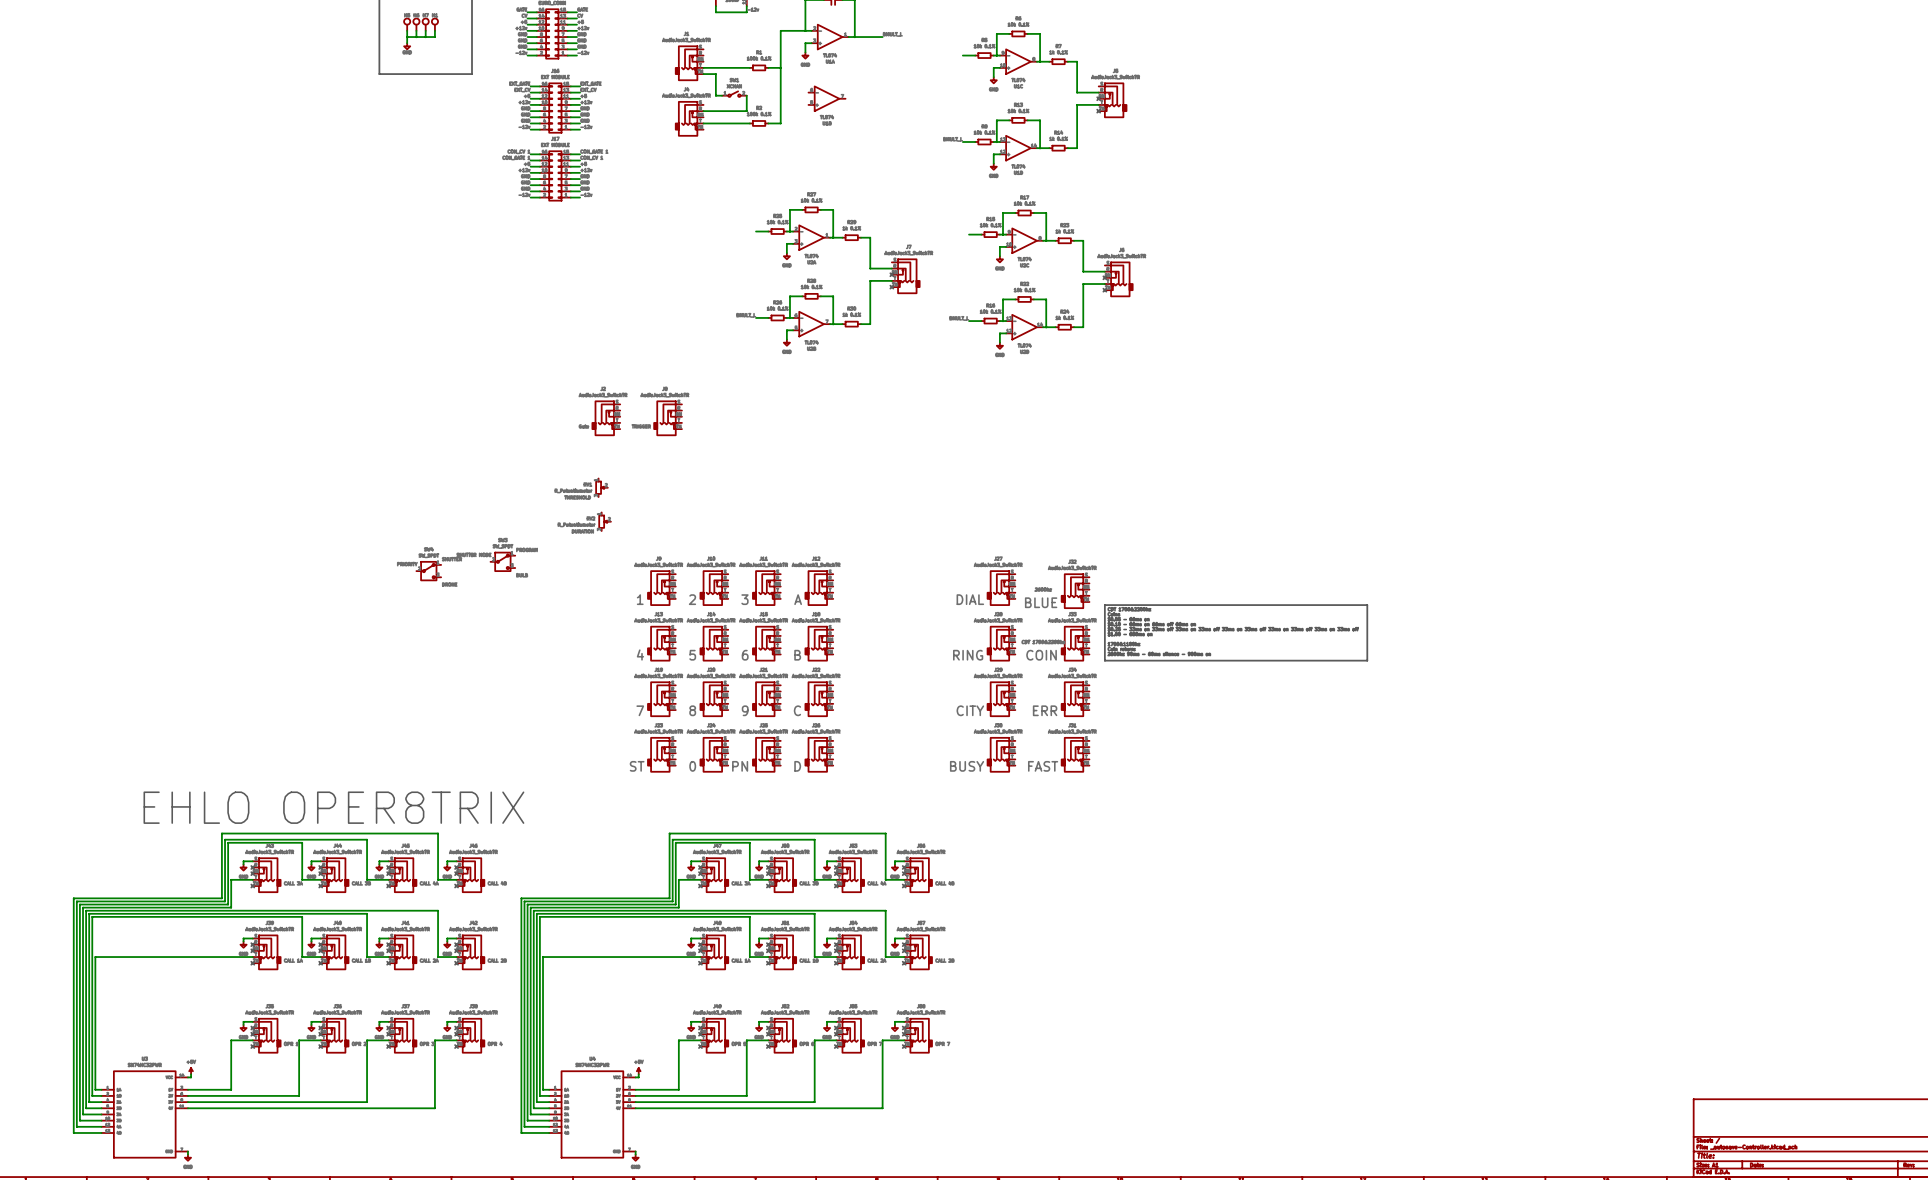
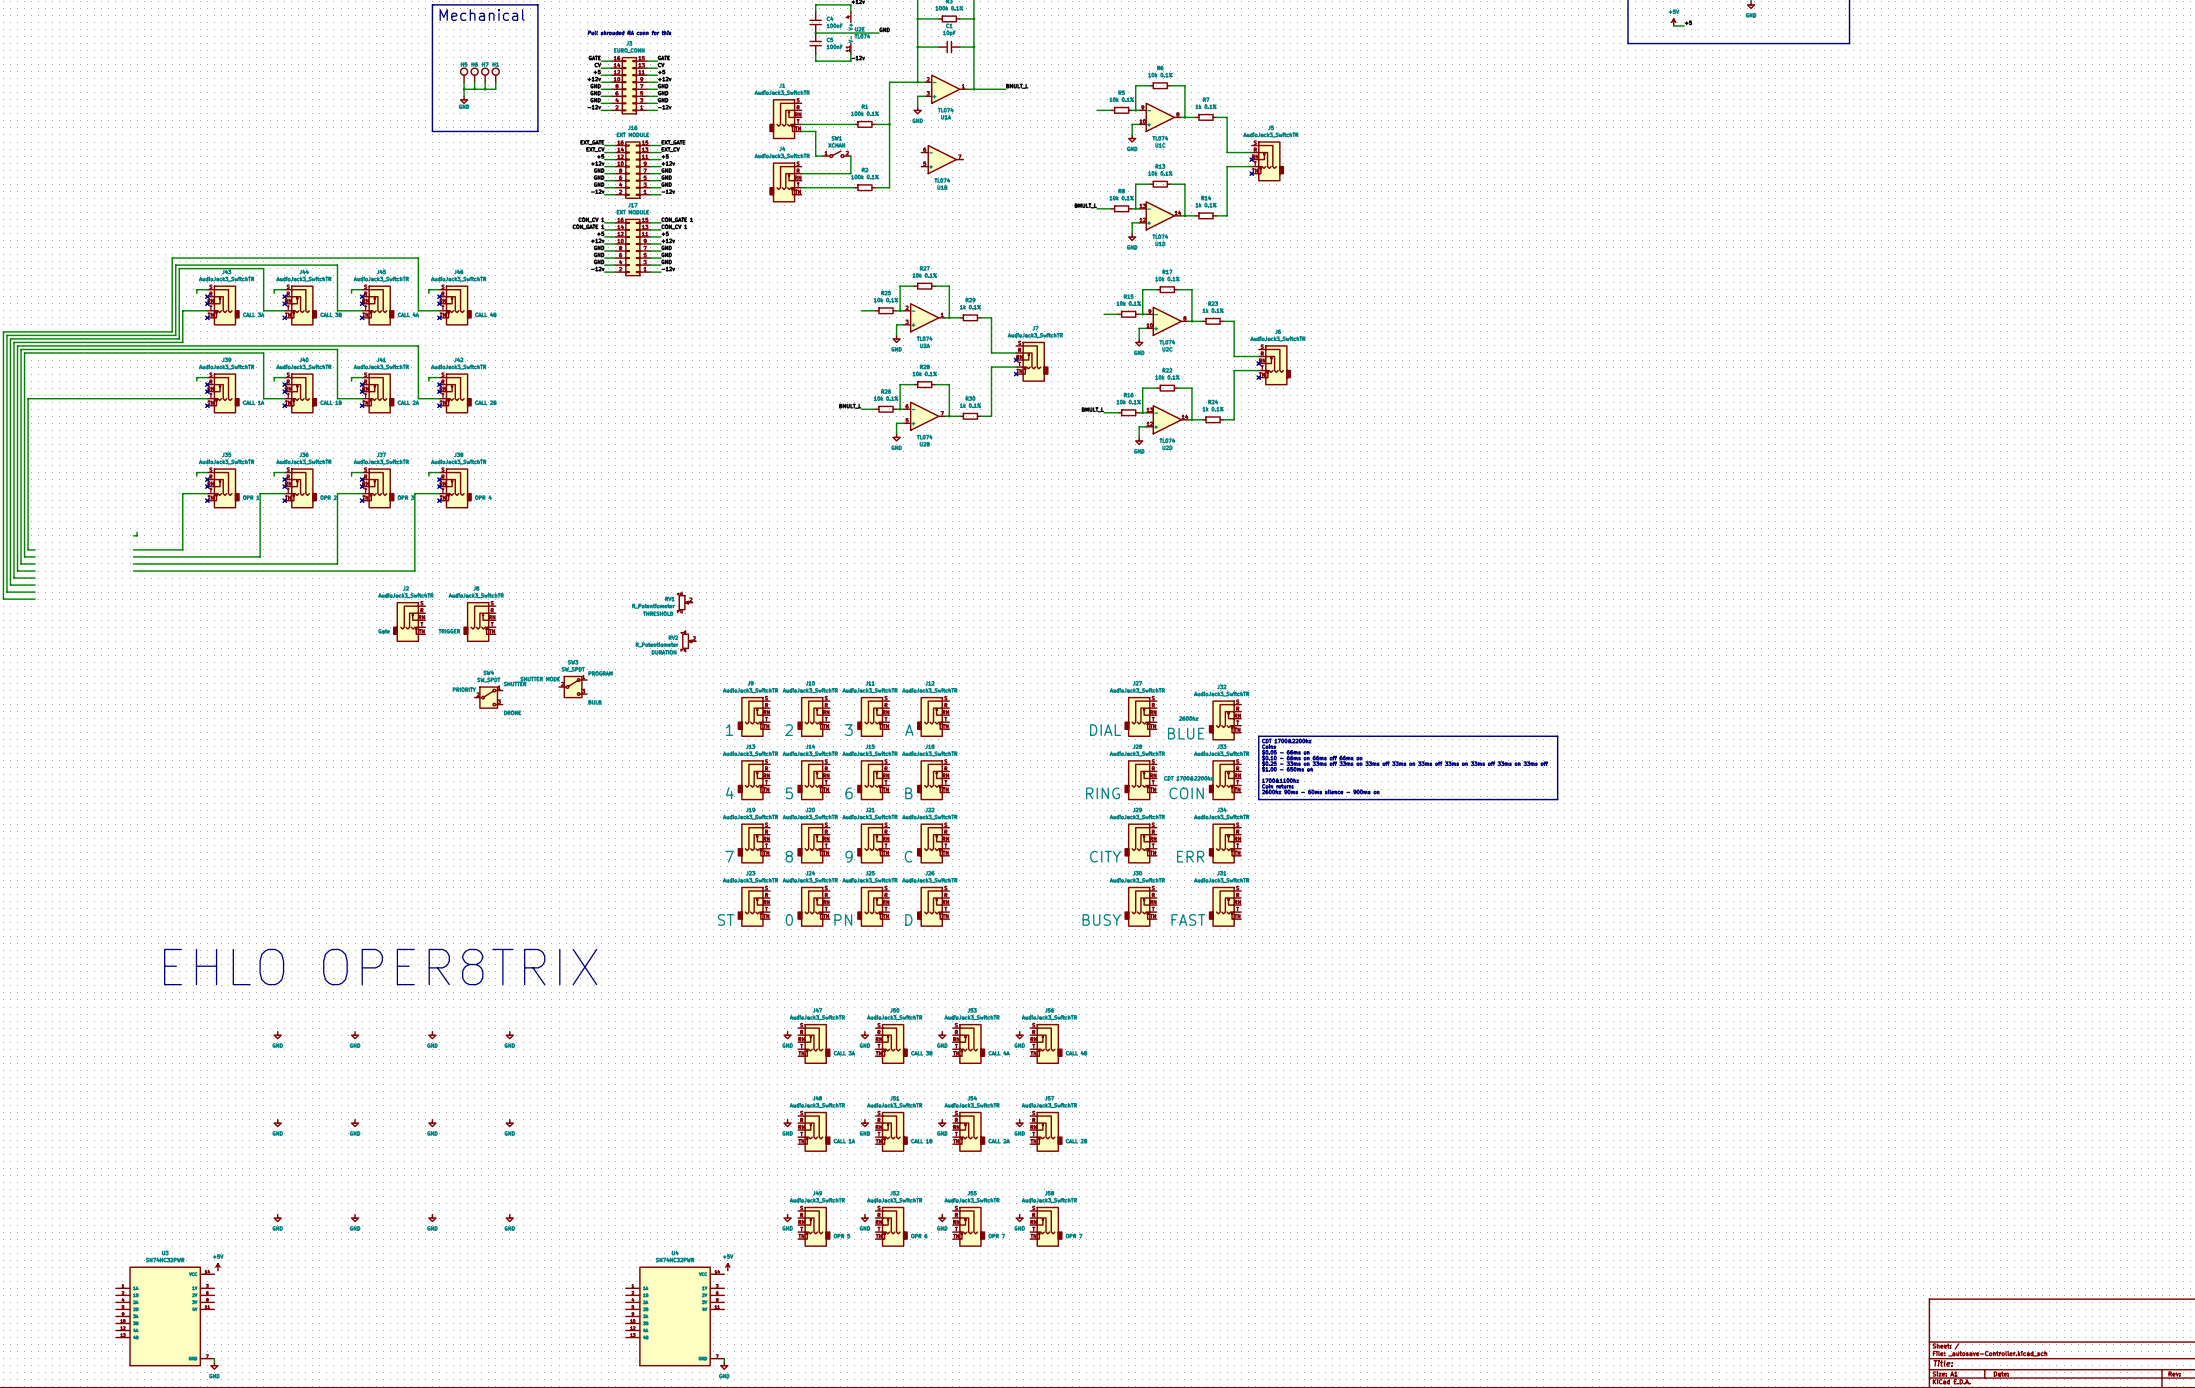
wire: none -> (207, 289) (196, 289) (196, 293)
wire: none -> (284, 289) (274, 289) (274, 293)
wire: none -> (362, 289) (351, 289) (351, 293)
wire: none -> (439, 289) (428, 289) (428, 293)
no-connect mark: none -> (207, 296)
no-connect mark: none -> (284, 296)
no-connect mark: none -> (362, 296)
no-connect mark: none -> (439, 296)
no-connect mark: none -> (207, 303)
no-connect mark: none -> (284, 303)
no-connect mark: none -> (362, 303)
no-connect mark: none -> (439, 303)
wire: none -> (207, 310) (182, 310) (182, 342) (13, 342) (13, 578) (35, 578)
wire: none -> (284, 310) (263, 310) (263, 268) (179, 268) (179, 338) (10, 338) (10, 585) (35, 585)
wire: none -> (362, 310) (337, 310) (337, 265) (175, 265) (175, 335) (6, 335) (6, 592) (35, 592)
wire: none -> (439, 310) (418, 310) (418, 258) (172, 258) (172, 331) (3, 331) (3, 599) (35, 599)
no-connect mark: none -> (207, 317)
no-connect mark: none -> (284, 317)
no-connect mark: none -> (362, 317)
no-connect mark: none -> (439, 317)
wire: none -> (207, 377) (196, 377) (196, 381)
wire: none -> (284, 377) (274, 377) (274, 381)
wire: none -> (362, 377) (351, 377) (351, 381)
wire: none -> (439, 377) (428, 377) (428, 381)
no-connect mark: none -> (207, 384)
no-connect mark: none -> (284, 384)
no-connect mark: none -> (362, 384)
no-connect mark: none -> (439, 384)
no-connect mark: none -> (207, 391)
no-connect mark: none -> (284, 391)
no-connect mark: none -> (362, 391)
no-connect mark: none -> (439, 391)
wire: none -> (207, 398) (28, 398) (28, 549) (35, 549)
wire: none -> (284, 398) (263, 398) (263, 352) (24, 352) (24, 556) (35, 556)
wire: none -> (362, 398) (337, 398) (337, 349) (21, 349) (21, 563) (35, 563)
wire: none -> (439, 398) (418, 398) (418, 345) (17, 345) (17, 571) (35, 571)
no-connect mark: none -> (207, 405)
no-connect mark: none -> (284, 405)
no-connect mark: none -> (362, 405)
no-connect mark: none -> (439, 405)
wire: none -> (207, 472) (196, 472) (196, 476)
wire: none -> (284, 472) (274, 472) (274, 476)
wire: none -> (362, 472) (351, 472) (351, 476)
wire: none -> (439, 472) (428, 472) (428, 476)
no-connect mark: none -> (207, 479)
no-connect mark: none -> (284, 479)
no-connect mark: none -> (362, 479)
no-connect mark: none -> (439, 479)
no-connect mark: none -> (207, 486)
no-connect mark: none -> (284, 486)
no-connect mark: none -> (362, 486)
no-connect mark: none -> (439, 486)
wire: none -> (207, 493) (182, 493) (182, 549) (133, 549)
wire: none -> (284, 493) (260, 493) (260, 556) (133, 556)
wire: none -> (362, 493) (337, 493) (337, 563) (133, 563)
wire: none -> (439, 493) (414, 493) (414, 571) (133, 571)
no-connect mark: none -> (207, 500)
no-connect mark: none -> (284, 500)
no-connect mark: none -> (362, 500)
no-connect mark: none -> (439, 500)
part position: (606, 418) -> (409, 621)
part position: (667, 418) -> (479, 621)
wire: none -> (137, 532) (137, 535) (133, 535)
wire: (252, 861) (243, 861) (243, 864) -> none
wire: (320, 861) (311, 861) (311, 864) -> none
wire: (388, 861) (379, 861) (379, 864) -> none
wire: (456, 861) (447, 861) (447, 864) -> none
wire: (700, 861) (691, 861) (691, 864) -> none
wire: (768, 861) (759, 861) (759, 864) -> none
wire: (836, 861) (827, 861) (827, 864) -> none
wire: (904, 861) (894, 861) (894, 864) -> none
no-connect mark: (252, 867) -> none
no-connect mark: (320, 867) -> none
no-connect mark: (388, 867) -> none
no-connect mark: (456, 867) -> none
no-connect mark: (700, 867) -> none
no-connect mark: (768, 867) -> none
no-connect mark: (836, 867) -> none
no-connect mark: (904, 867) -> none
no-connect mark: (252, 873) -> none
no-connect mark: (320, 873) -> none
no-connect mark: (388, 873) -> none
no-connect mark: (456, 873) -> none
no-connect mark: (700, 873) -> none
no-connect mark: (768, 873) -> none
no-connect mark: (836, 873) -> none
no-connect mark: (904, 873) -> none
part position: (266, 875) -> (223, 305)
part position: (334, 875) -> (300, 305)
part position: (402, 875) -> (378, 305)
part position: (470, 875) -> (455, 305)
wire: (252, 879) (231, 879) (231, 907) (83, 907) (83, 1114) (101, 1114) -> none
wire: (320, 879) (302, 879) (302, 842) (228, 842) (228, 904) (79, 904) (79, 1120) (101, 1120) -> none
wire: (388, 879) (367, 879) (367, 839) (225, 839) (225, 901) (76, 901) (76, 1126) (101, 1126) -> none
wire: (456, 879) (438, 879) (438, 833) (221, 833) (221, 898) (73, 898) (73, 1132) (101, 1132) -> none
wire: (700, 879) (678, 879) (678, 907) (530, 907) (530, 1114) (549, 1114) -> none
wire: (768, 879) (749, 879) (749, 842) (675, 842) (675, 904) (527, 904) (527, 1120) (549, 1120) -> none
wire: (836, 879) (814, 879) (814, 839) (672, 839) (672, 901) (524, 901) (524, 1126) (549, 1126) -> none
wire: (904, 879) (885, 879) (885, 833) (669, 833) (669, 898) (521, 898) (521, 1132) (549, 1132) -> none
no-connect mark: (252, 886) -> none
no-connect mark: (320, 886) -> none
no-connect mark: (388, 886) -> none
no-connect mark: (456, 886) -> none
no-connect mark: (700, 886) -> none
no-connect mark: (768, 886) -> none
no-connect mark: (836, 886) -> none
no-connect mark: (904, 886) -> none
wire: (252, 938) (243, 938) (243, 941) -> none
wire: (320, 938) (311, 938) (311, 941) -> none
wire: (388, 938) (379, 938) (379, 941) -> none
wire: (456, 938) (447, 938) (447, 941) -> none
wire: (700, 938) (691, 938) (691, 941) -> none
wire: (768, 938) (759, 938) (759, 941) -> none
wire: (836, 938) (827, 938) (827, 941) -> none
wire: (904, 938) (894, 938) (894, 941) -> none
no-connect mark: (252, 944) -> none
no-connect mark: (320, 944) -> none
no-connect mark: (388, 944) -> none
no-connect mark: (456, 944) -> none
no-connect mark: (700, 944) -> none
no-connect mark: (768, 944) -> none
no-connect mark: (836, 944) -> none
no-connect mark: (904, 944) -> none
no-connect mark: (252, 950) -> none
no-connect mark: (320, 950) -> none
no-connect mark: (388, 950) -> none
no-connect mark: (456, 950) -> none
no-connect mark: (700, 950) -> none
no-connect mark: (768, 950) -> none
no-connect mark: (836, 950) -> none
no-connect mark: (904, 950) -> none
part position: (266, 952) -> (223, 393)
part position: (334, 952) -> (300, 393)
part position: (402, 952) -> (378, 393)
part position: (470, 952) -> (455, 393)
wire: (252, 957) (95, 957) (95, 1089) (101, 1089) -> none
wire: (320, 957) (302, 957) (302, 916) (92, 916) (92, 1095) (101, 1095) -> none
wire: (388, 957) (367, 957) (367, 913) (89, 913) (89, 1102) (101, 1102) -> none
wire: (456, 957) (438, 957) (438, 910) (86, 910) (86, 1108) (101, 1108) -> none
wire: (700, 957) (543, 957) (543, 1089) (549, 1089) -> none
wire: (768, 957) (749, 957) (749, 916) (539, 916) (539, 1095) (549, 1095) -> none
wire: (836, 957) (814, 957) (814, 913) (536, 913) (536, 1102) (549, 1102) -> none
wire: (904, 957) (885, 957) (885, 910) (533, 910) (533, 1108) (549, 1108) -> none
no-connect mark: (252, 963) -> none
no-connect mark: (320, 963) -> none
no-connect mark: (388, 963) -> none
no-connect mark: (456, 963) -> none
no-connect mark: (700, 963) -> none
no-connect mark: (768, 963) -> none
no-connect mark: (836, 963) -> none
no-connect mark: (904, 963) -> none
wire: (252, 1021) (243, 1021) (243, 1024) -> none
wire: (320, 1021) (311, 1021) (311, 1024) -> none
wire: (388, 1021) (379, 1021) (379, 1024) -> none
wire: (456, 1021) (447, 1021) (447, 1024) -> none
wire: (700, 1021) (691, 1021) (691, 1024) -> none
wire: (768, 1021) (759, 1021) (759, 1024) -> none
wire: (836, 1021) (827, 1021) (827, 1024) -> none
wire: (904, 1021) (894, 1021) (894, 1024) -> none
no-connect mark: (252, 1028) -> none
no-connect mark: (320, 1028) -> none
no-connect mark: (388, 1028) -> none
no-connect mark: (456, 1028) -> none
no-connect mark: (700, 1028) -> none
no-connect mark: (768, 1028) -> none
no-connect mark: (836, 1028) -> none
no-connect mark: (904, 1028) -> none
no-connect mark: (252, 1034) -> none
no-connect mark: (320, 1034) -> none
no-connect mark: (388, 1034) -> none
no-connect mark: (456, 1034) -> none
no-connect mark: (700, 1034) -> none
no-connect mark: (768, 1034) -> none
no-connect mark: (836, 1034) -> none
no-connect mark: (904, 1034) -> none
part position: (266, 1035) -> (223, 488)
part position: (334, 1035) -> (300, 488)
part position: (402, 1035) -> (378, 488)
part position: (470, 1035) -> (455, 488)
wire: (252, 1040) (231, 1040) (231, 1089) (187, 1089) -> none
wire: (320, 1040) (299, 1040) (299, 1095) (187, 1095) -> none
wire: (388, 1040) (367, 1040) (367, 1102) (187, 1102) -> none
wire: (456, 1040) (434, 1040) (434, 1108) (187, 1108) -> none
wire: (700, 1040) (678, 1040) (678, 1089) (635, 1089) -> none
wire: (768, 1040) (746, 1040) (746, 1095) (635, 1095) -> none
wire: (836, 1040) (814, 1040) (814, 1102) (635, 1102) -> none
wire: (904, 1040) (882, 1040) (882, 1108) (635, 1108) -> none
no-connect mark: (252, 1046) -> none
no-connect mark: (320, 1046) -> none
no-connect mark: (388, 1046) -> none
no-connect mark: (456, 1046) -> none
no-connect mark: (700, 1046) -> none
no-connect mark: (768, 1046) -> none
no-connect mark: (836, 1046) -> none
no-connect mark: (904, 1046) -> none
wire: (191, 1074) (191, 1077) (187, 1077) -> none
wire: (638, 1074) (638, 1077) (635, 1077) -> none

